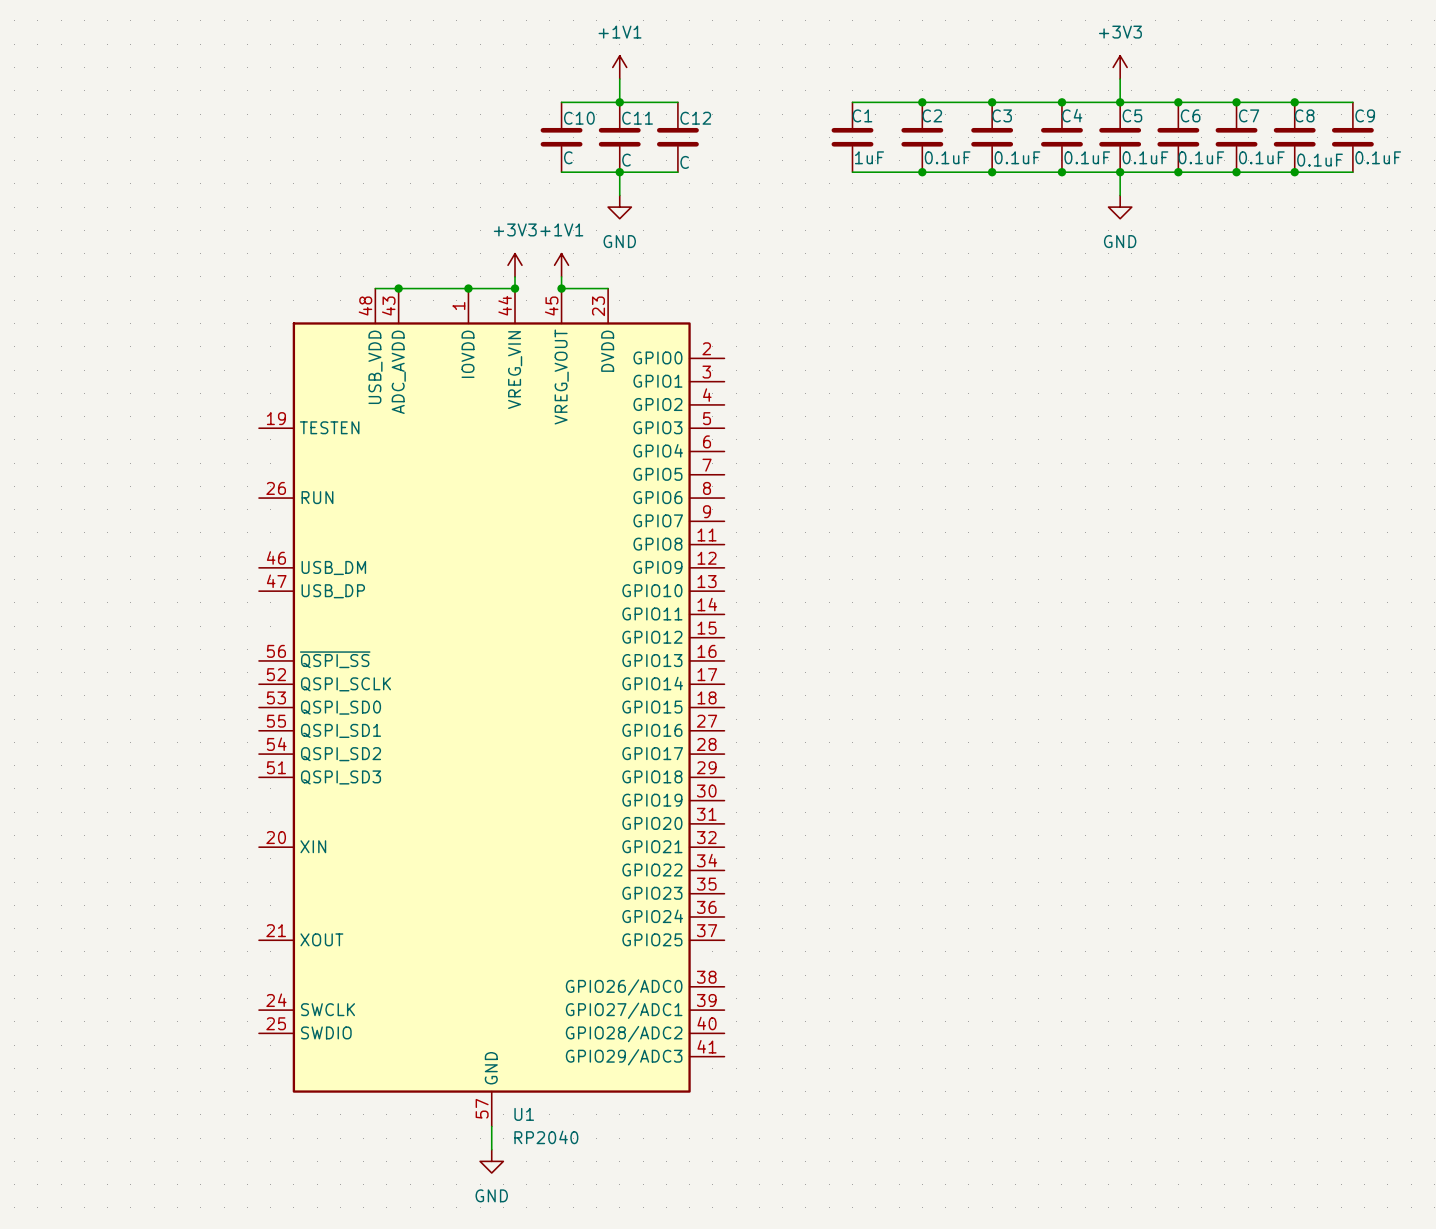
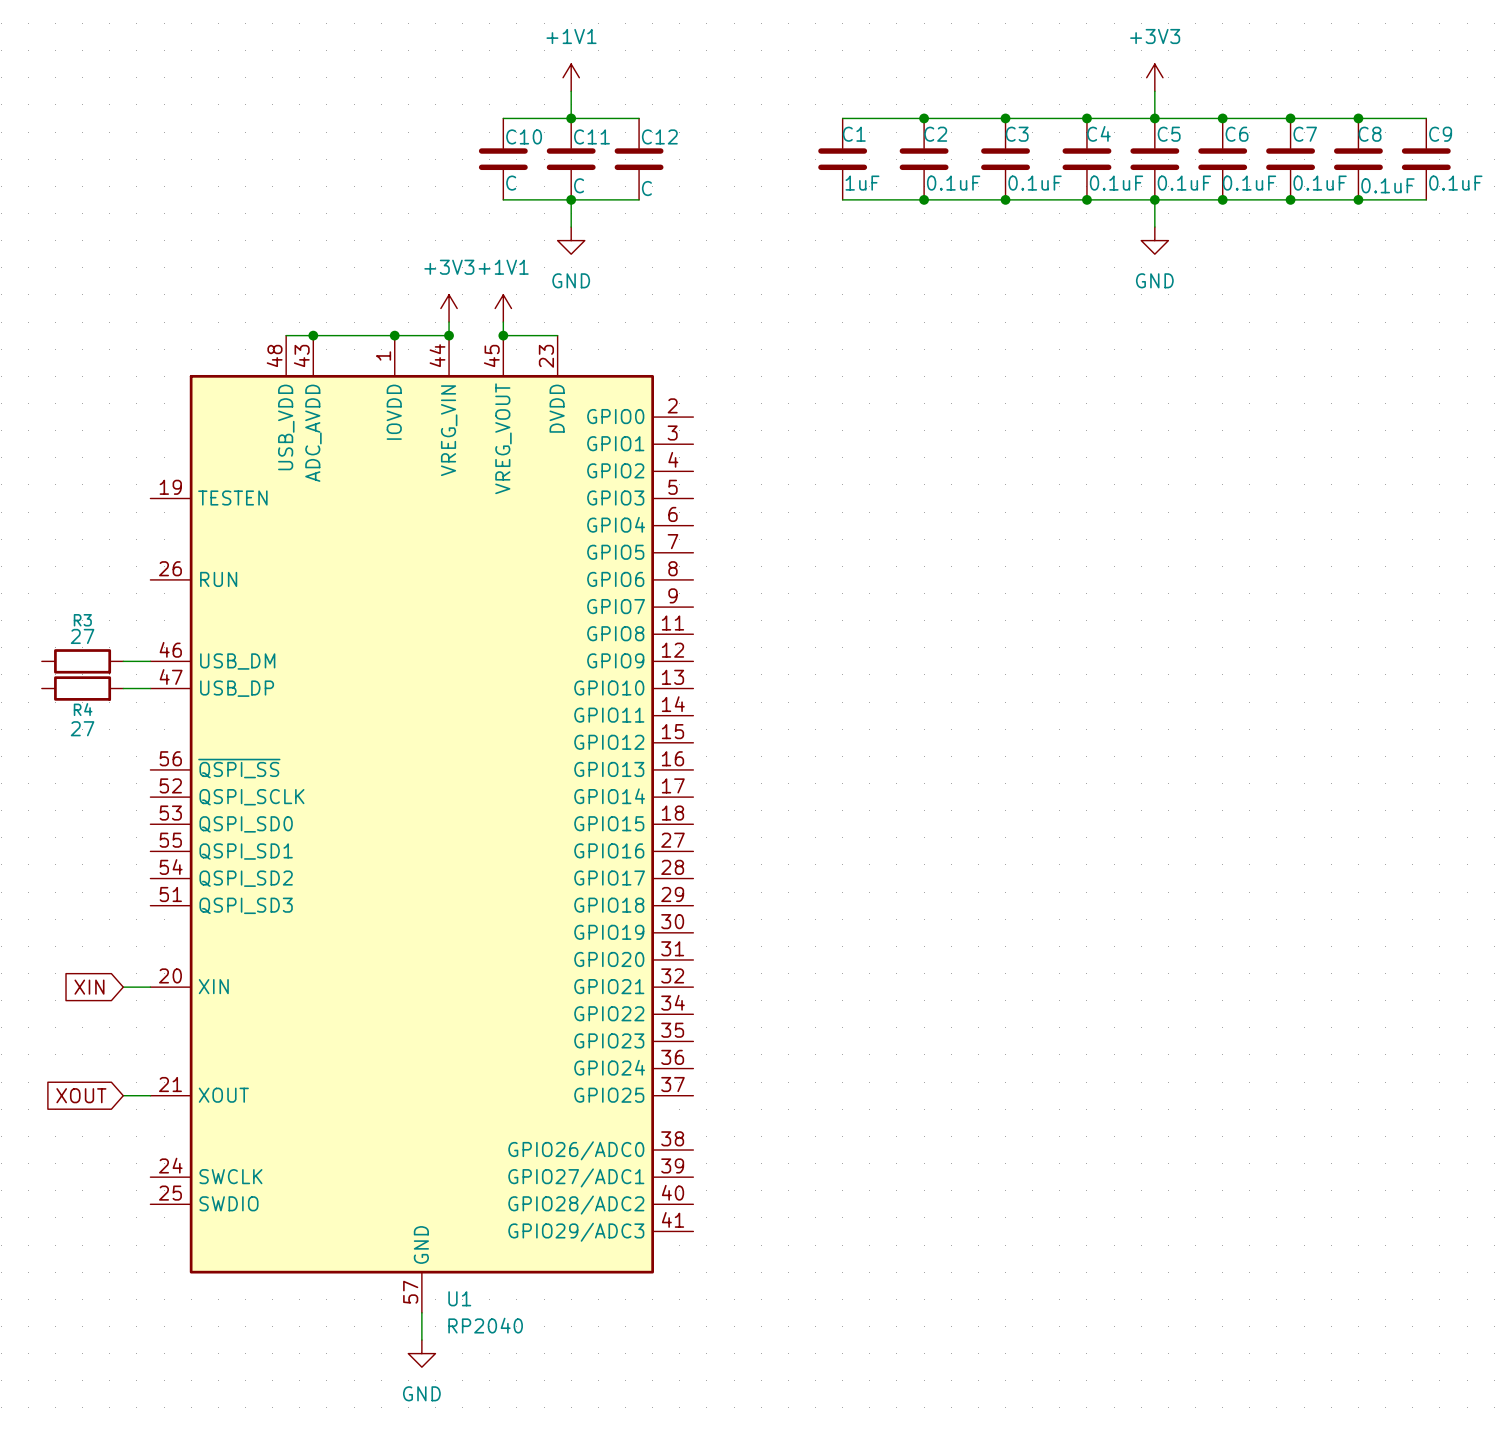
R3: none -> 27 (82, 661)
wire: none -> (123, 661) (150, 661)
R4: none -> 27 (82, 688)
wire: none -> (123, 688) (150, 688)
global label: none -> XIN (89, 987)
wire: none -> (123, 987) (150, 987)
global label: none -> XOUT (81, 1095)
wire: none -> (123, 1095) (150, 1095)

